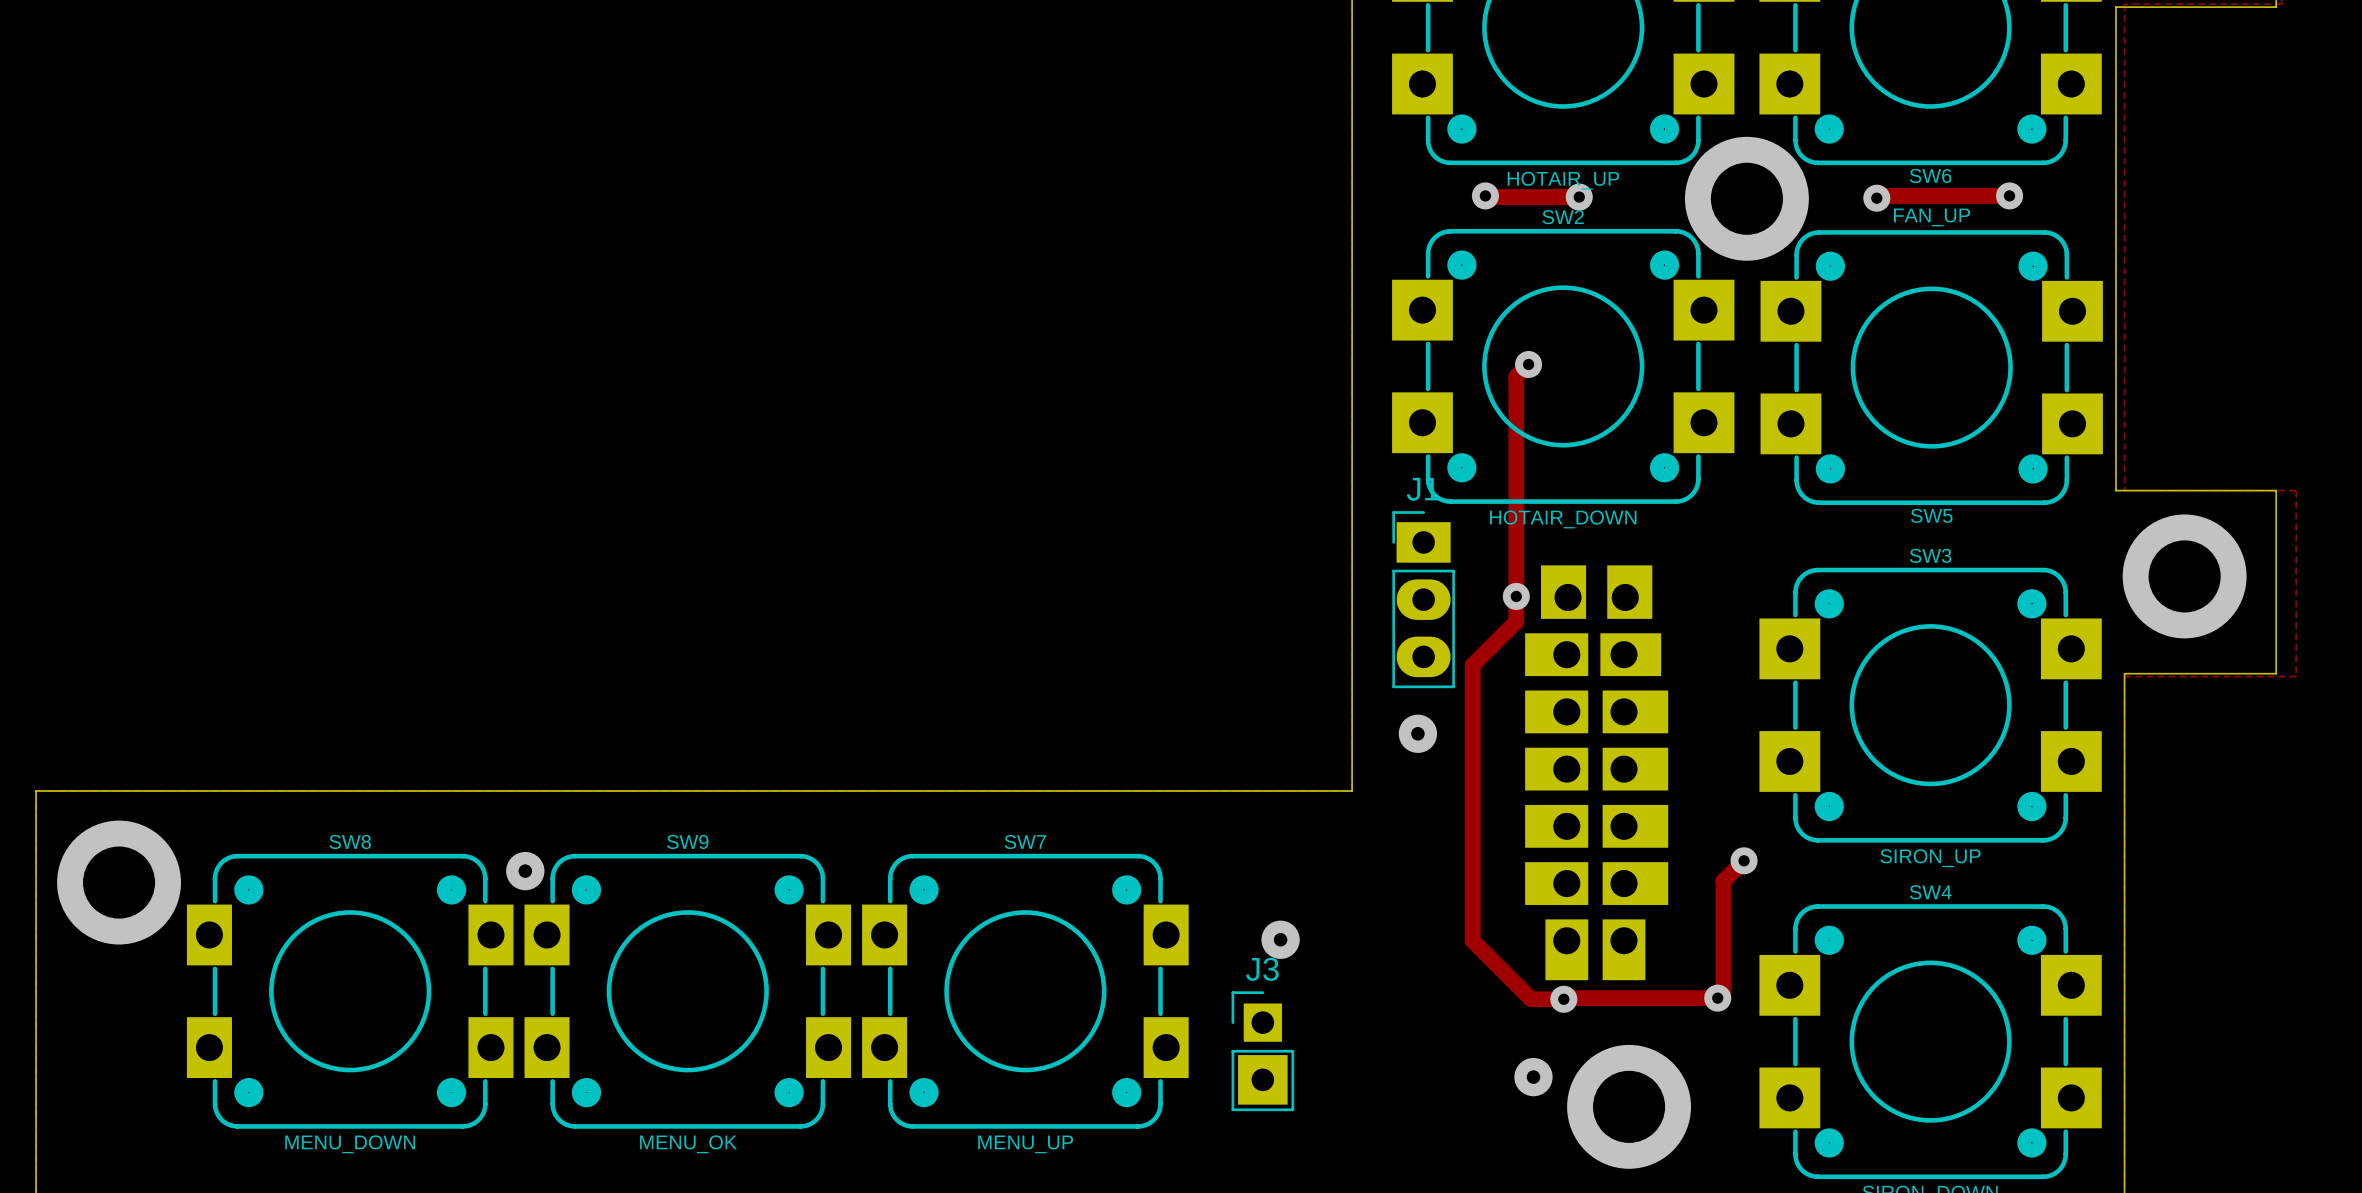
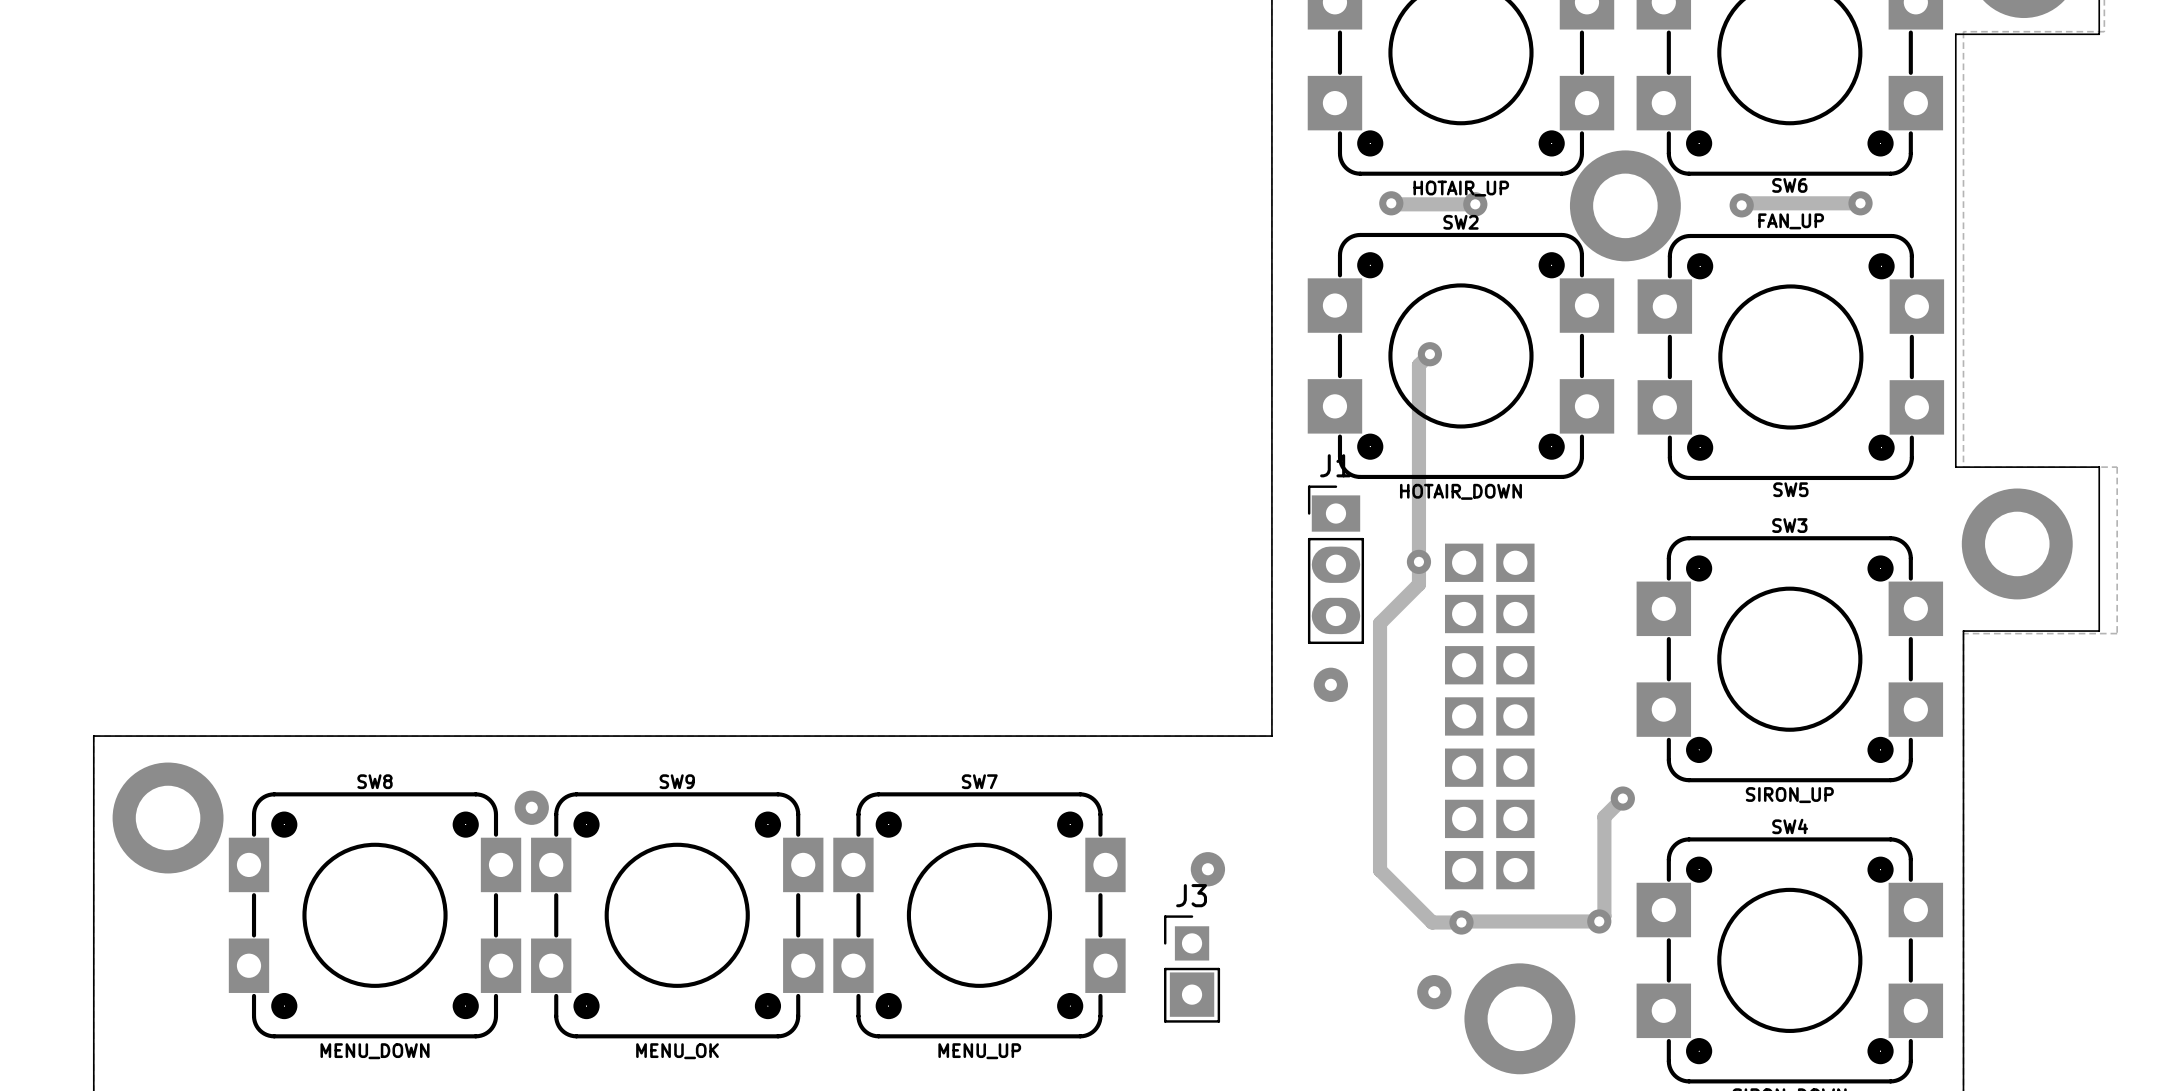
part footprint: [1525, 565, 1669, 981] -> [1444, 543, 1535, 890]

